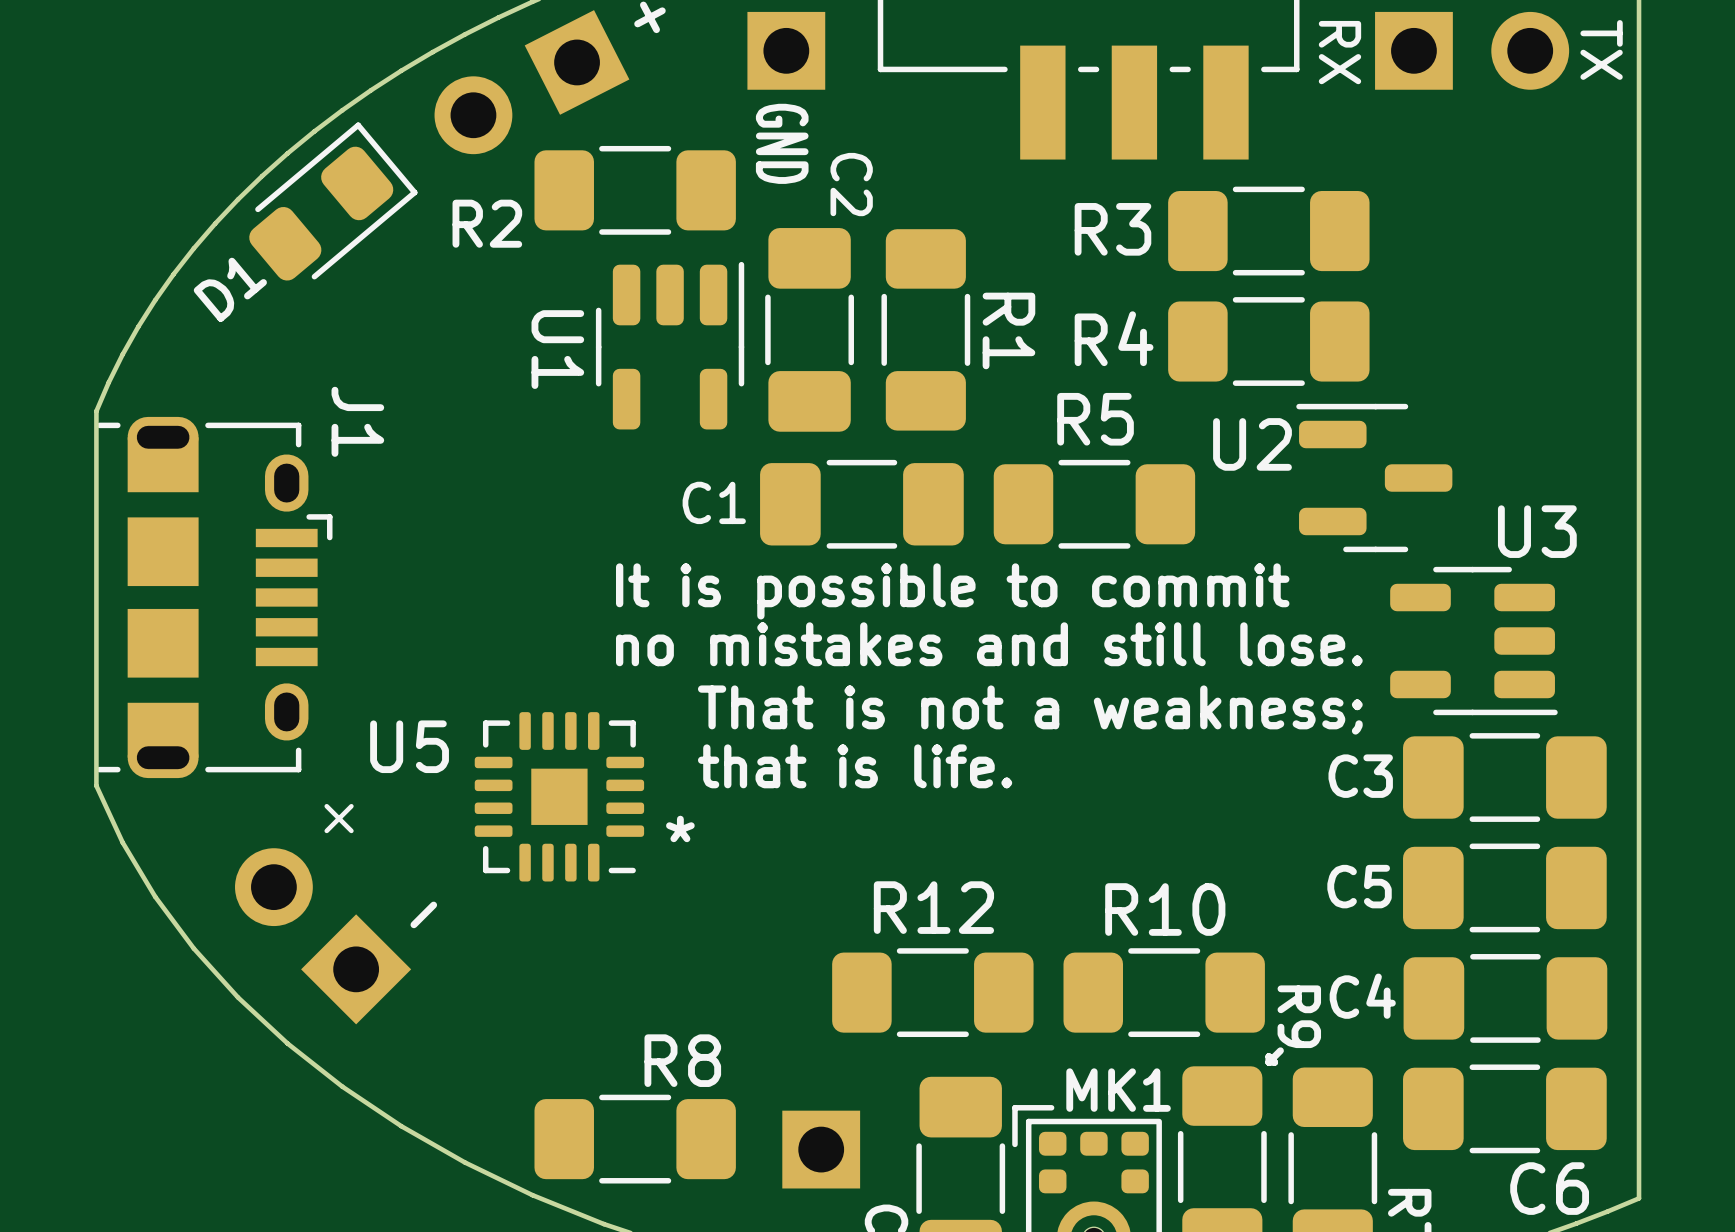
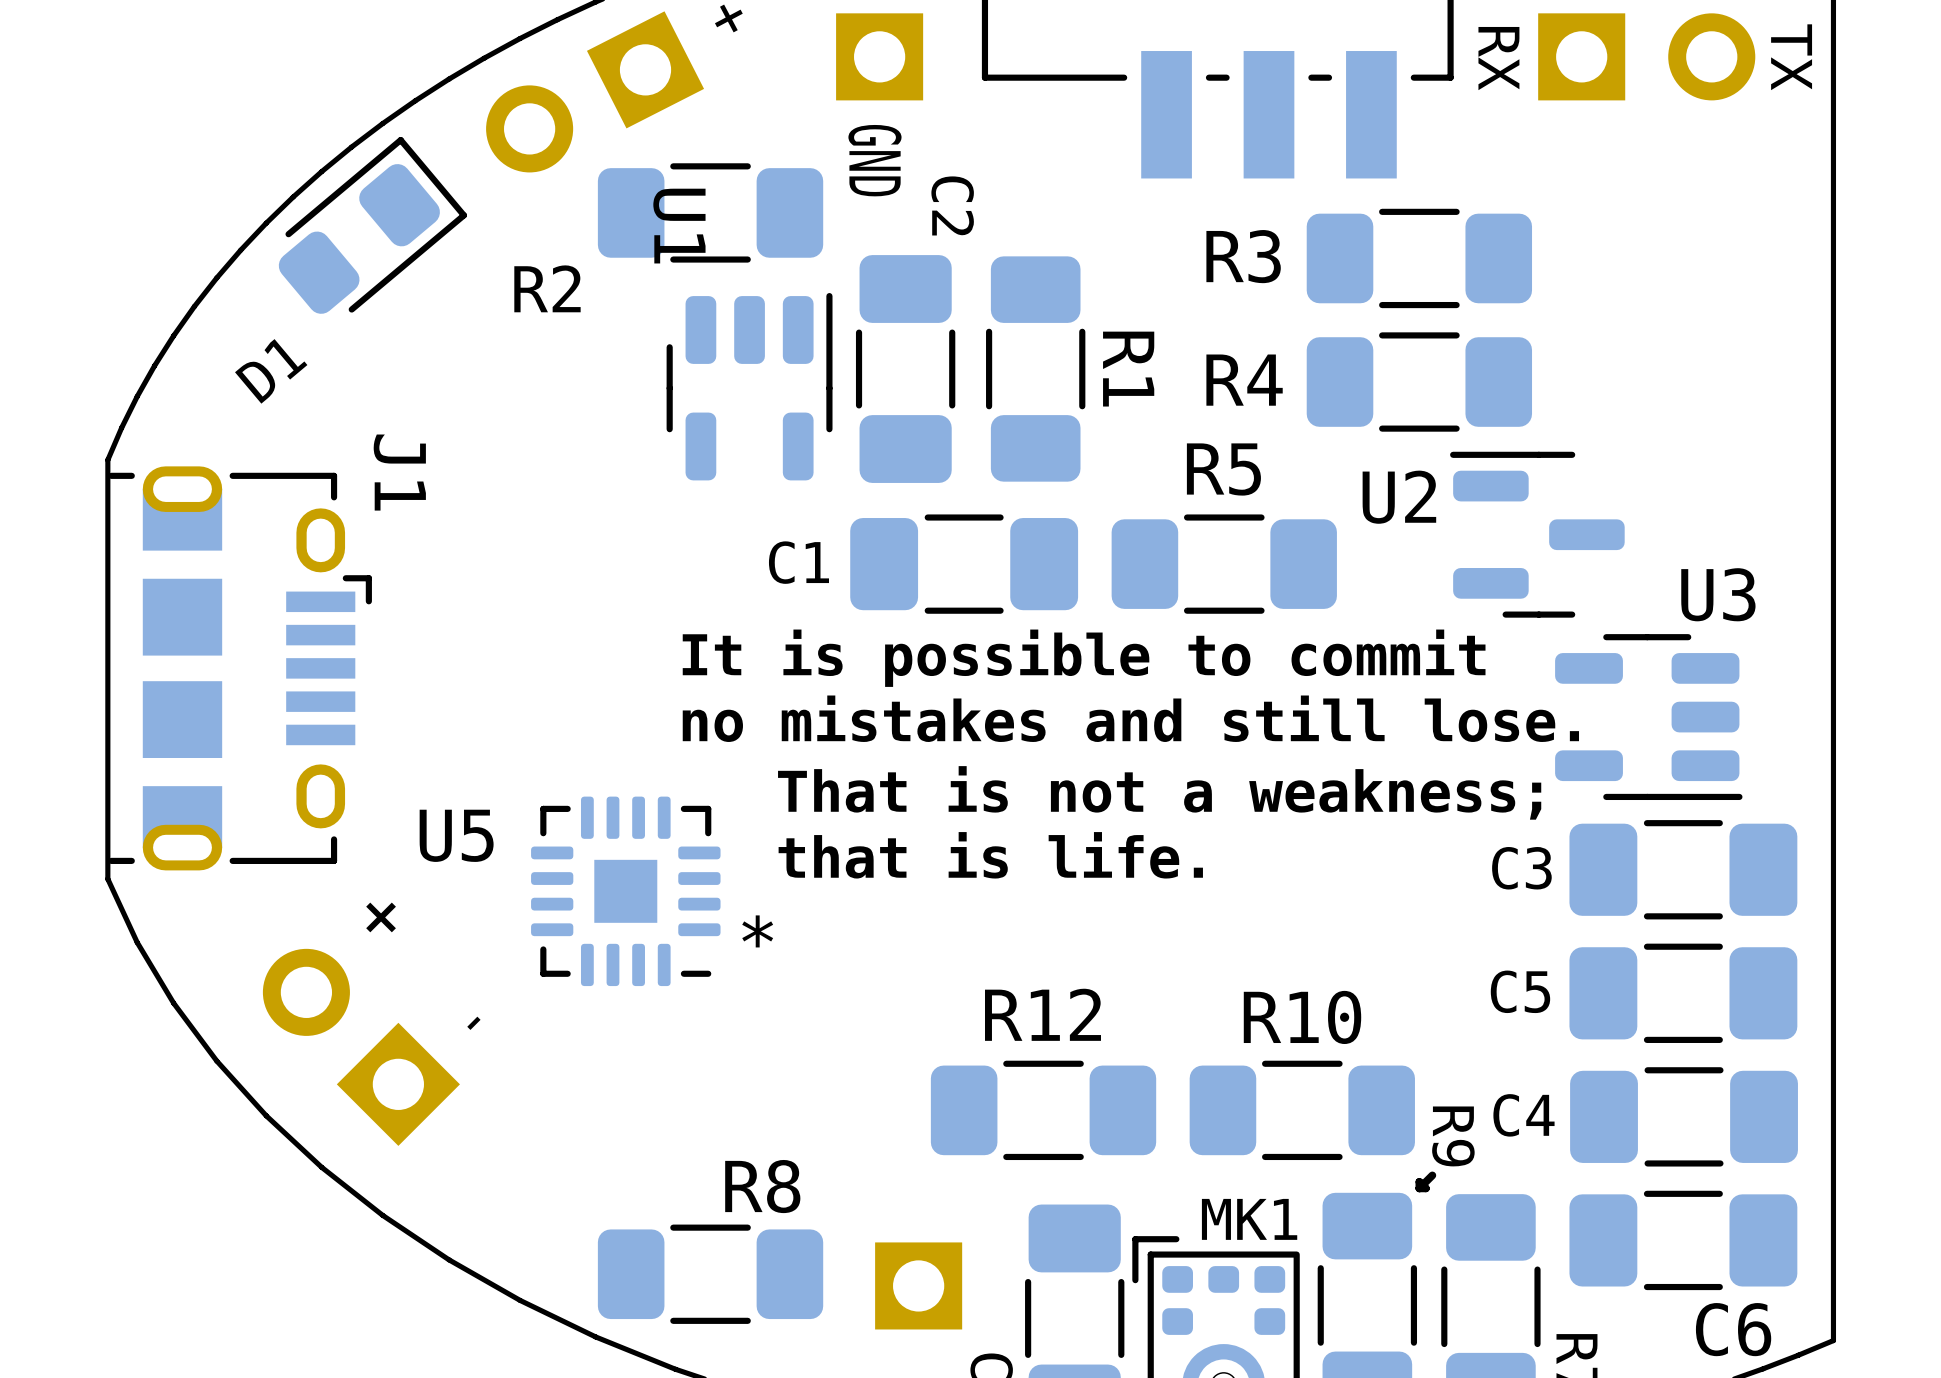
R2 name position: R2 (487, 223) -> R2 (547, 288)
D1 name position: D1 (230, 289) -> D1 (271, 371)
U1 name position: U1 (557, 349) -> U1 (679, 226)

